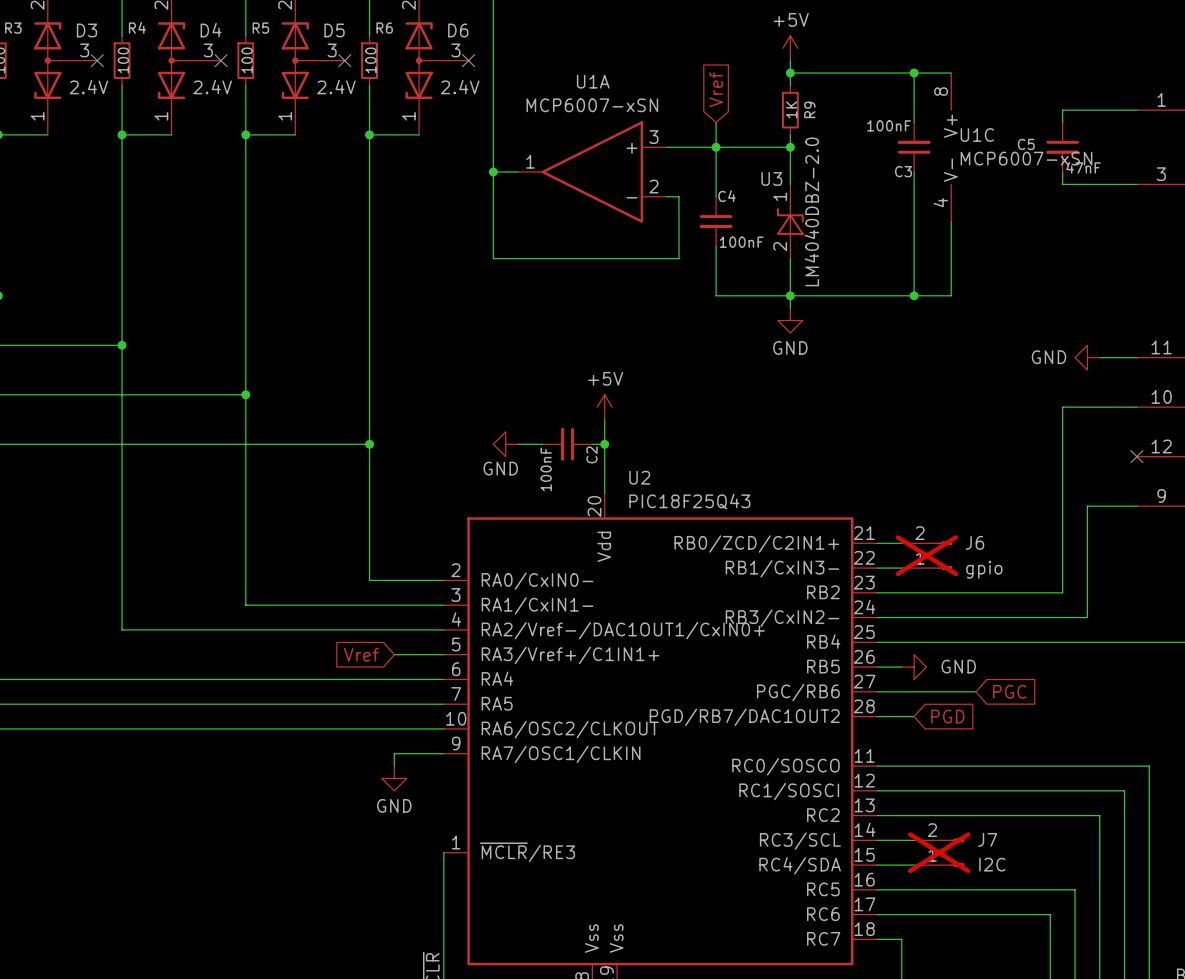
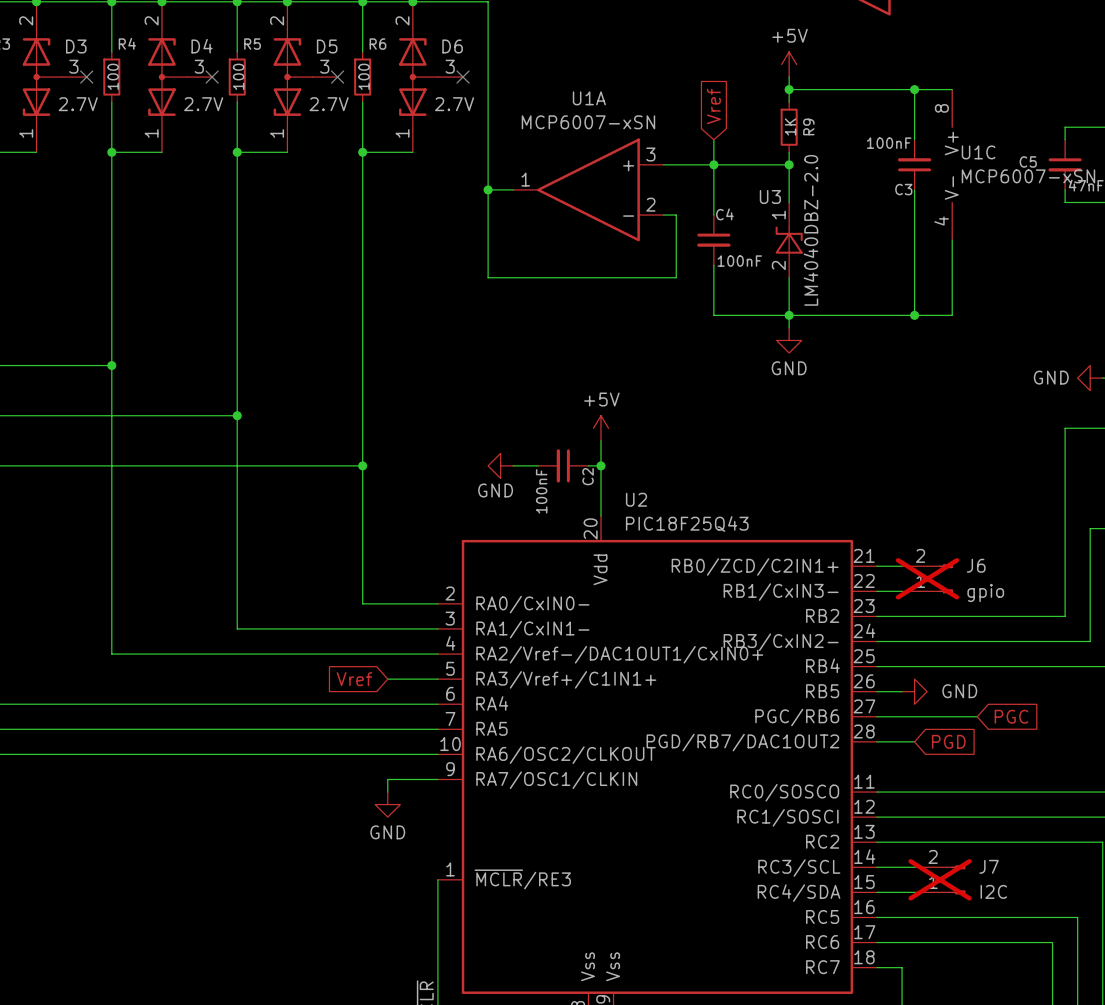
D3 value: 2.4V (88, 87) -> 2.7V (78, 104)
D4 value: 2.4V (212, 87) -> 2.7V (203, 104)
D5 value: 2.4V (336, 87) -> 2.7V (329, 104)
D6 value: 2.4V (460, 87) -> 2.7V (454, 104)

